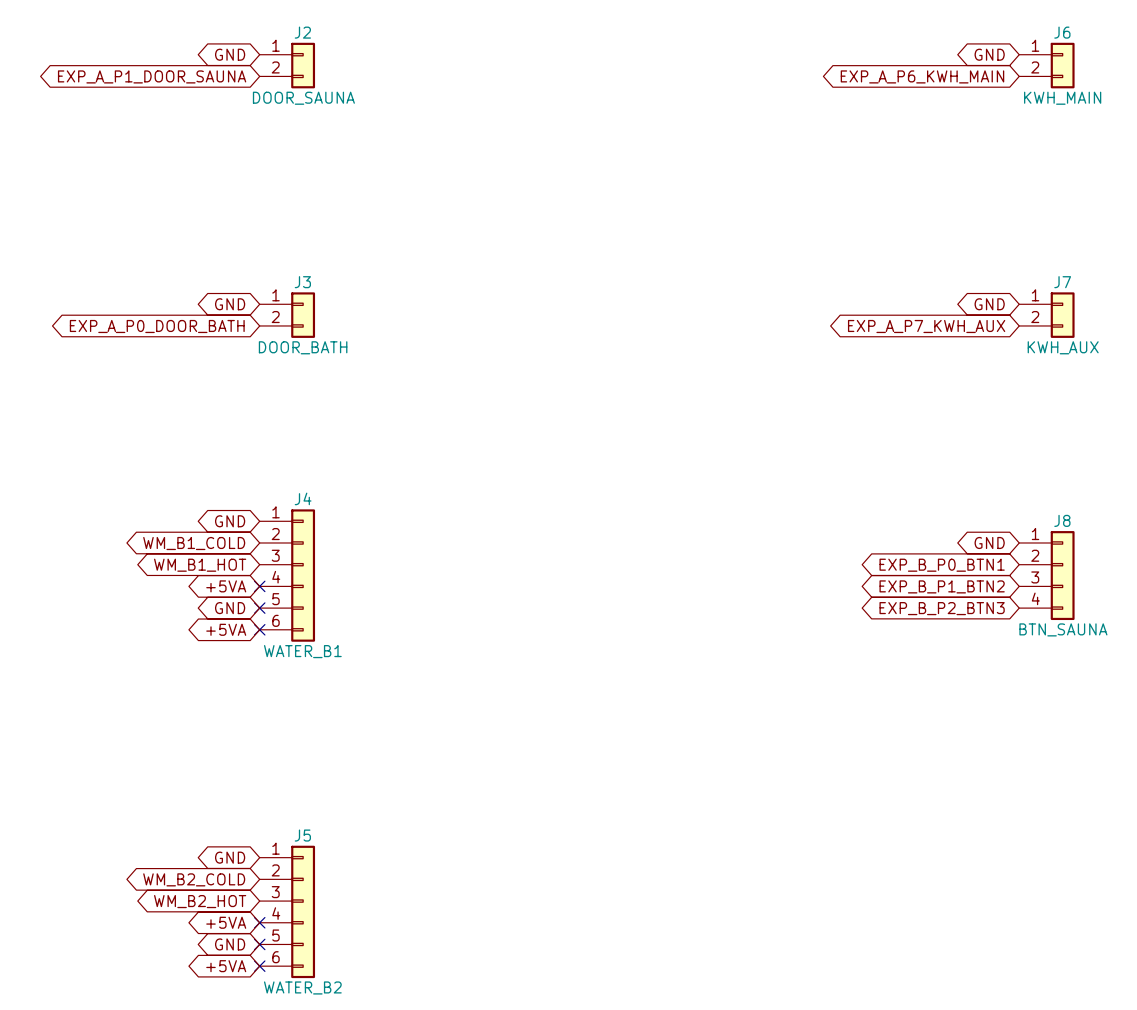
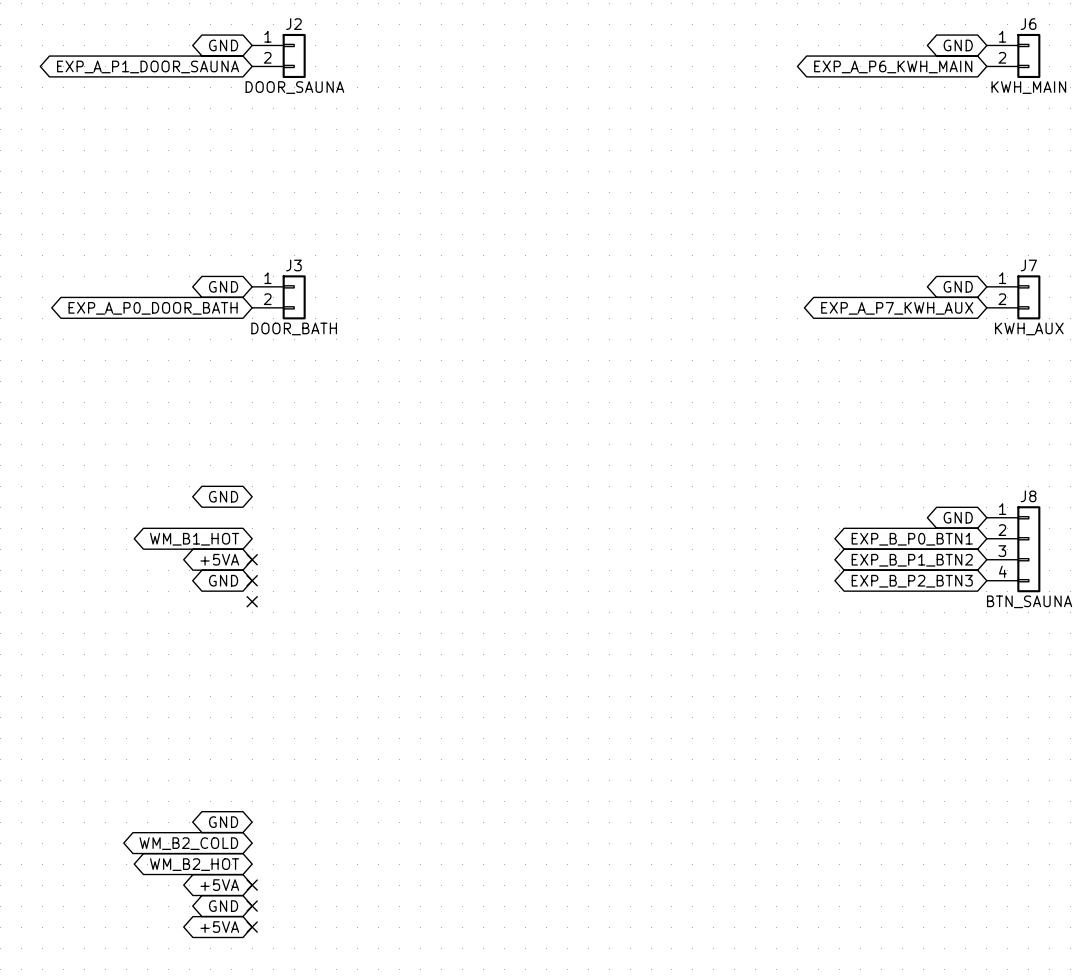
global label: WM_B1_COLD (194, 543) -> none
J4: WATER_B1 (287, 575) -> none
global label: +5VA (226, 629) -> none
J5: WATER_B2 (287, 911) -> none

